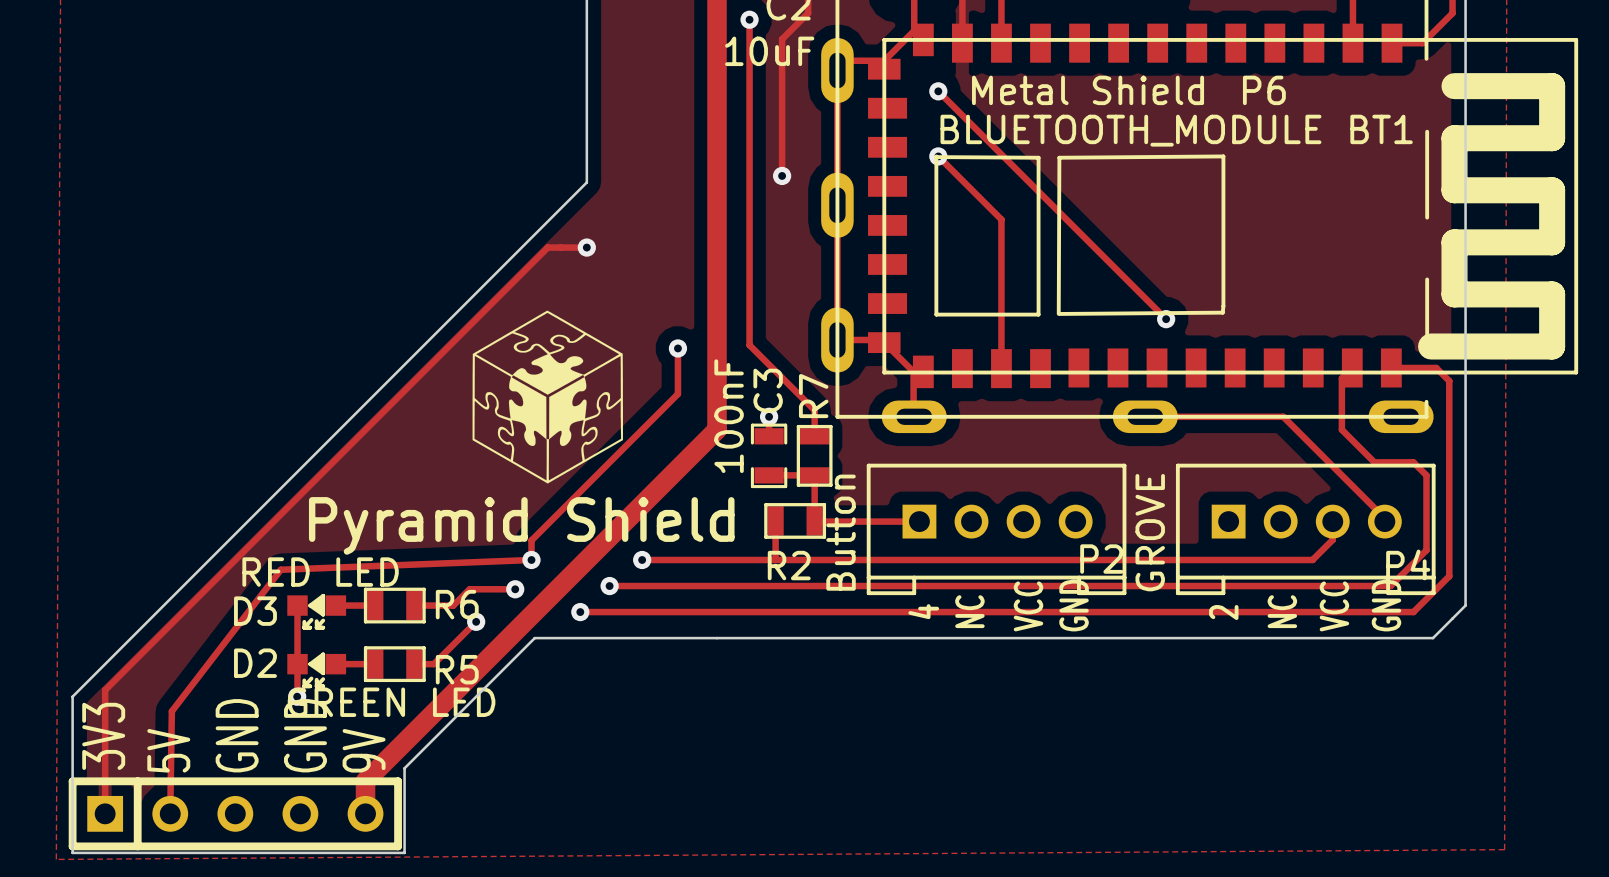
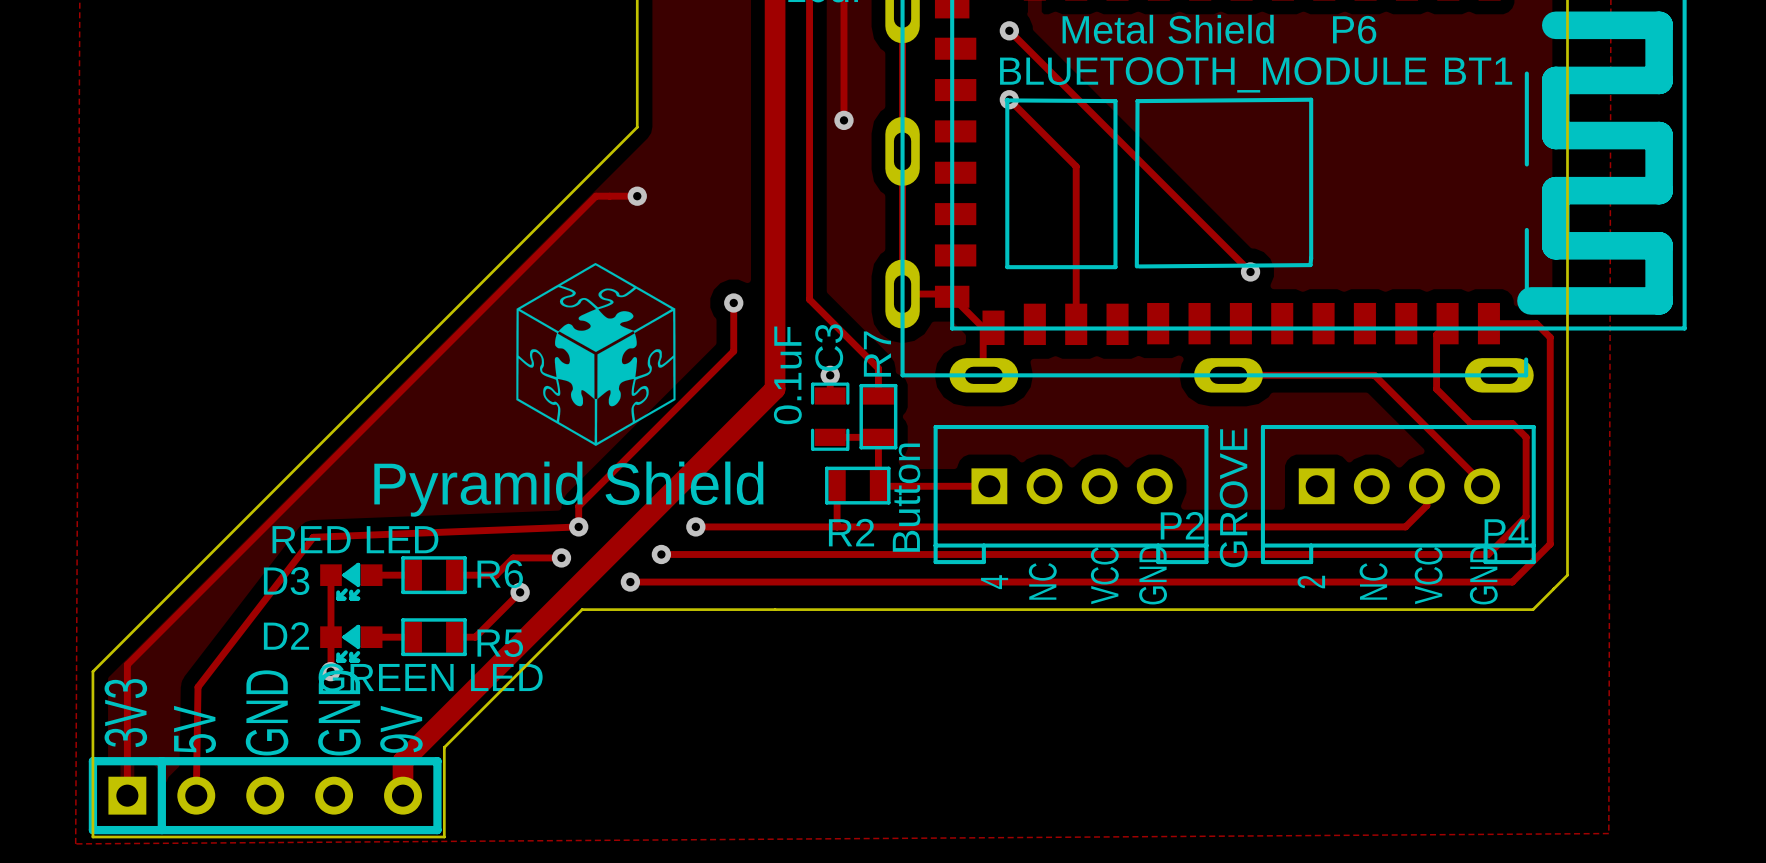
C3 value: 100nF (729, 416) -> 0.1uF (787, 375)

